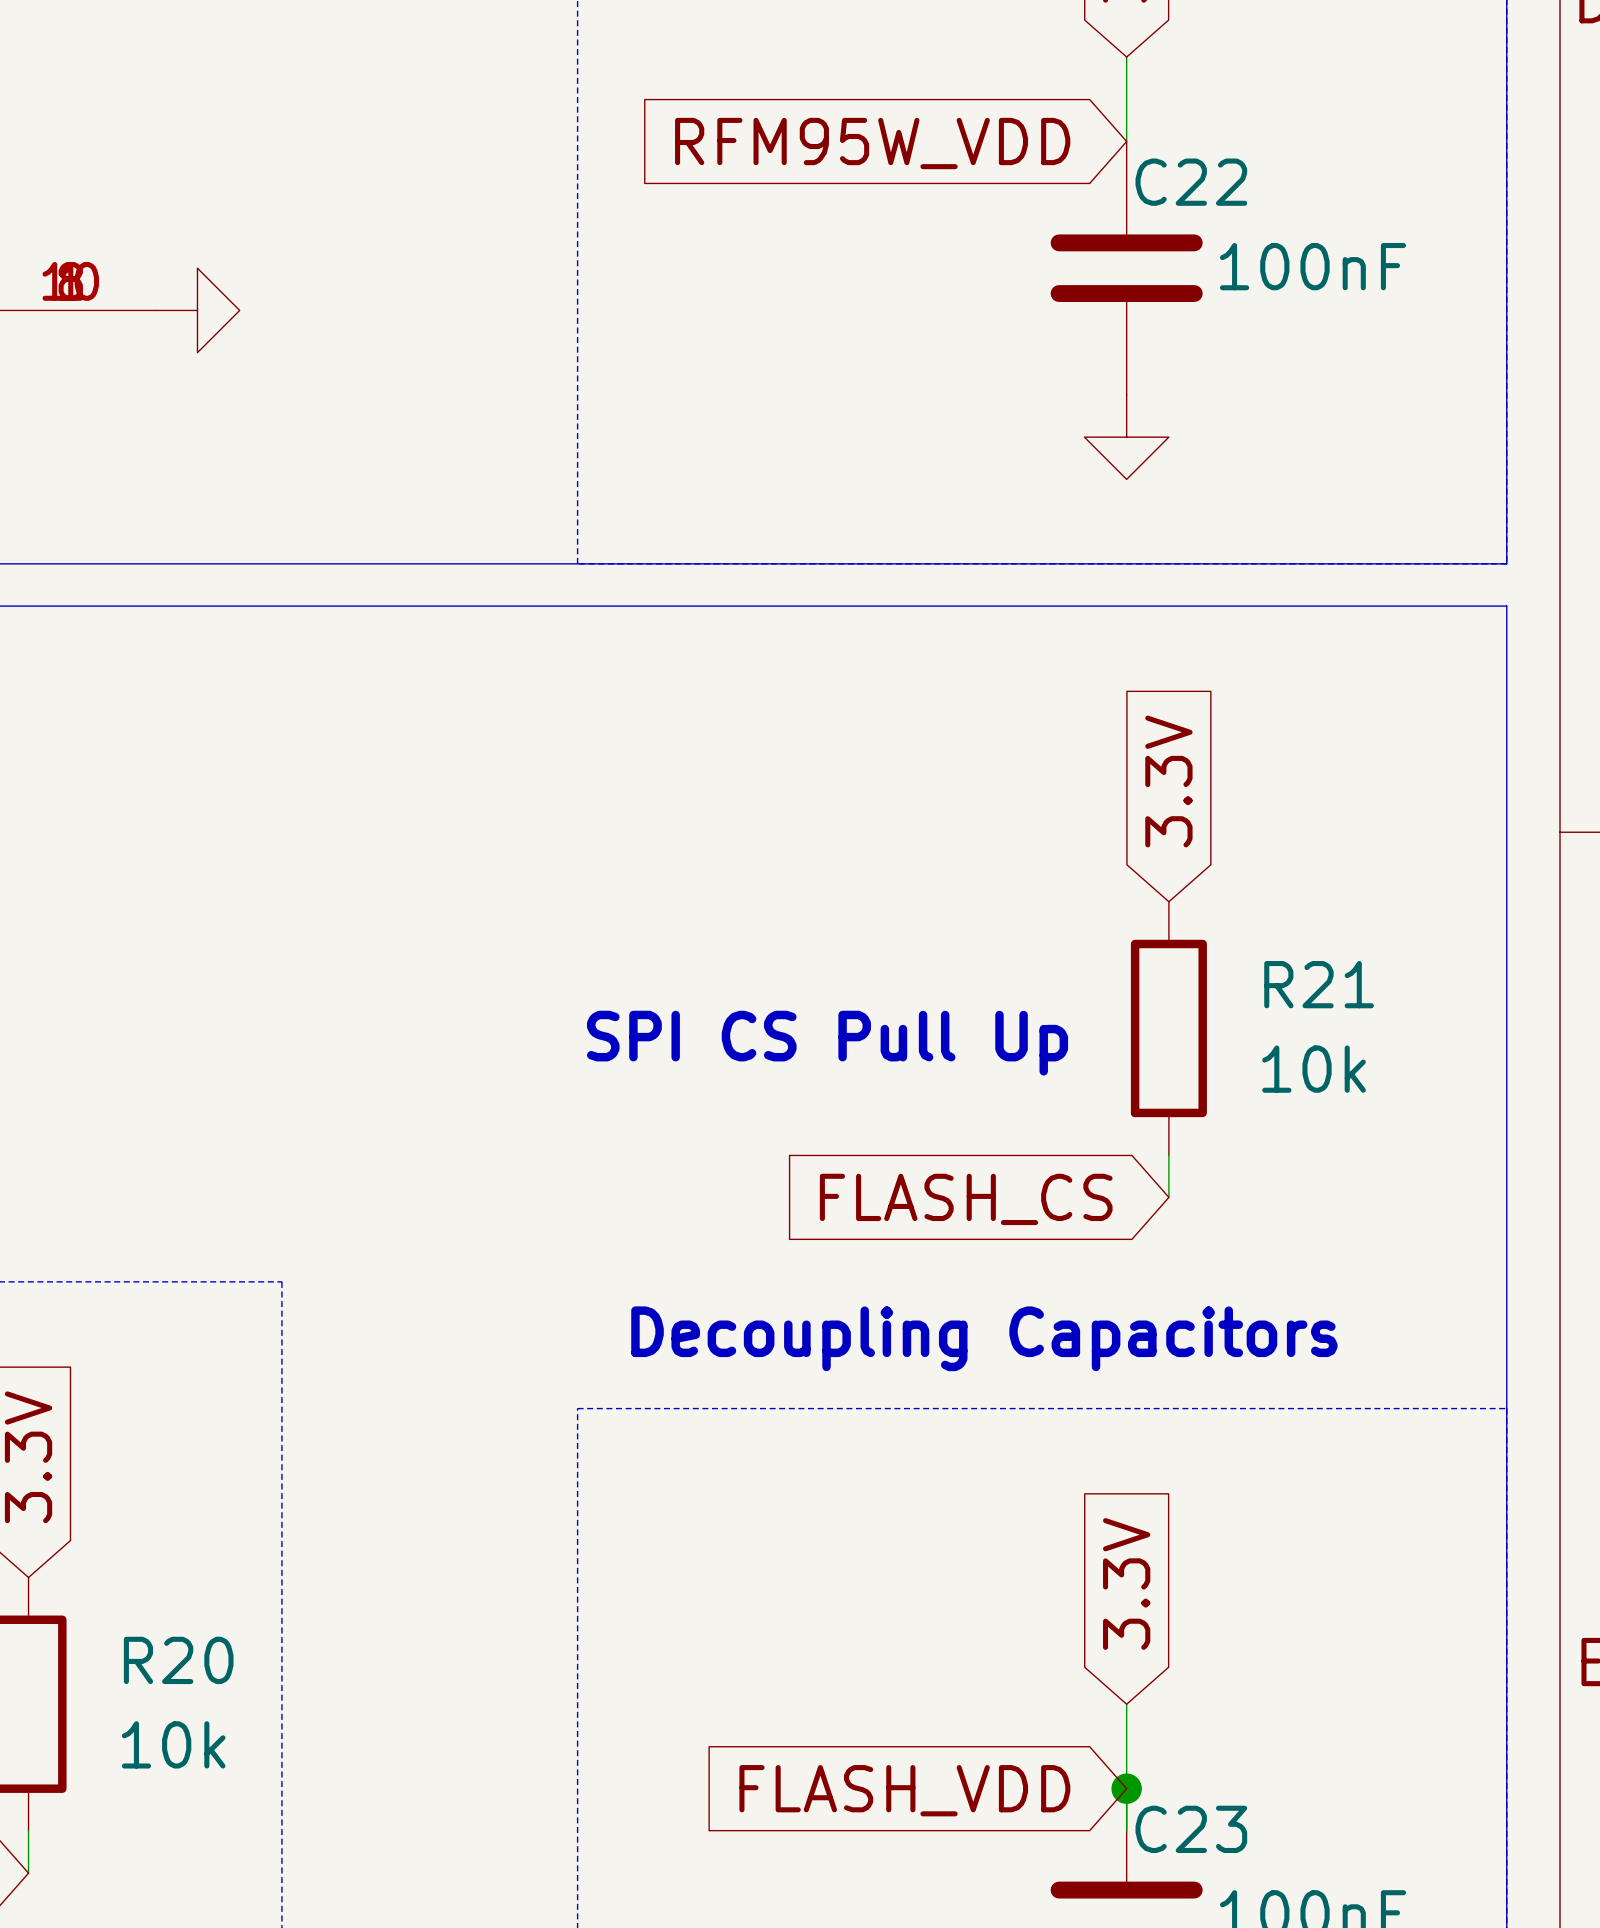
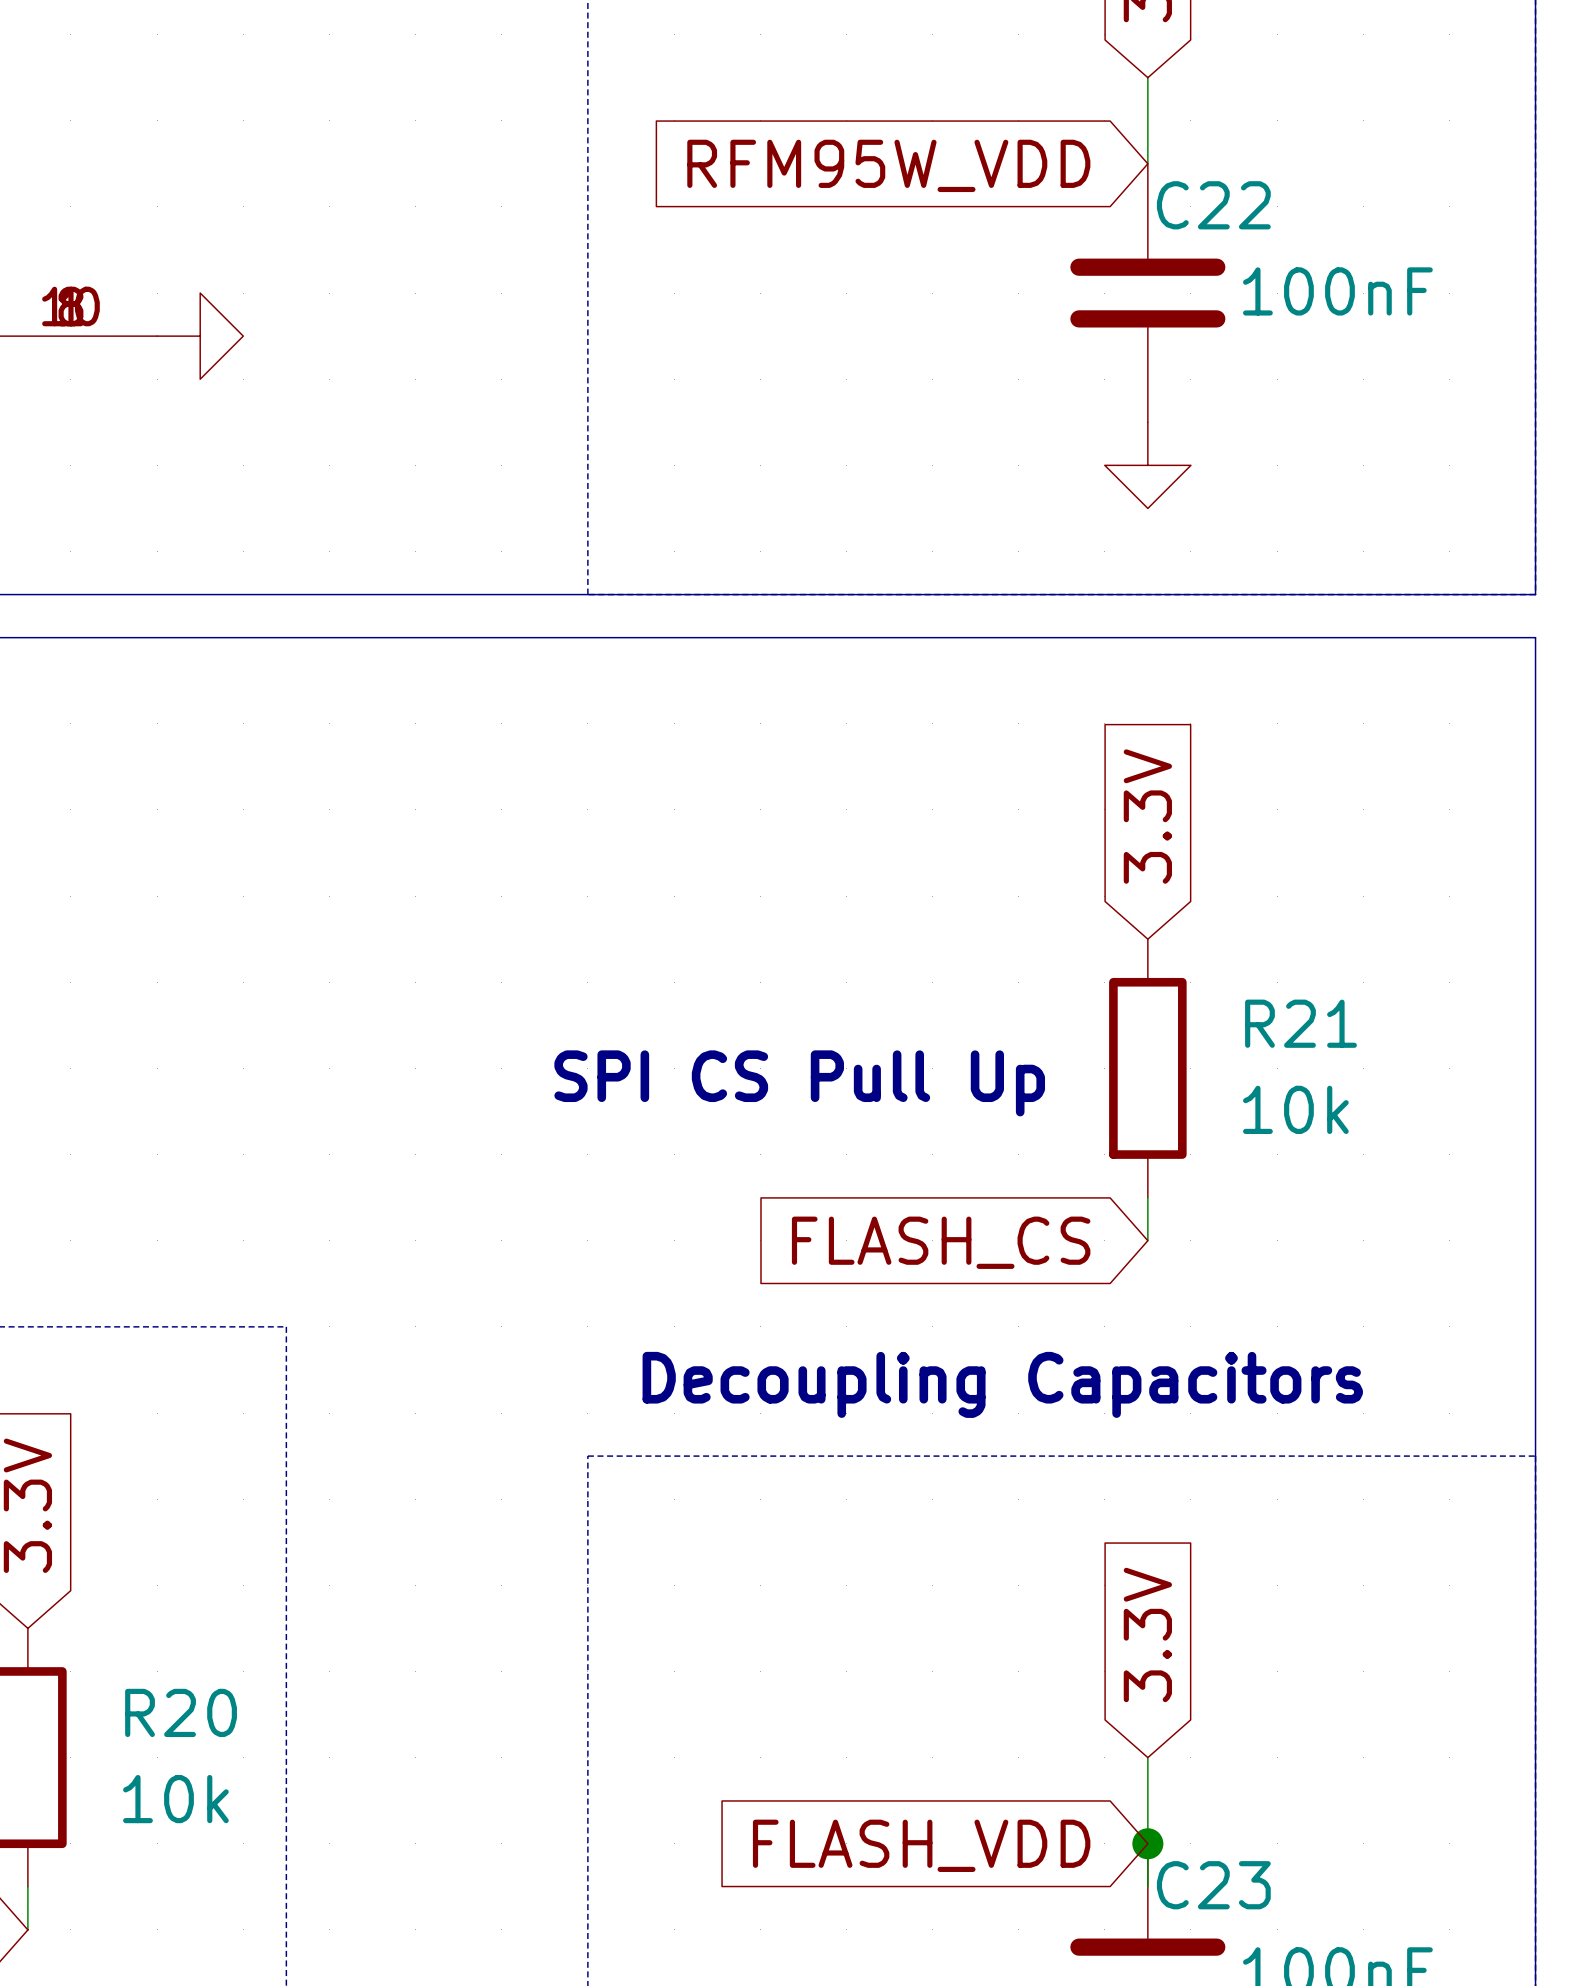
global label position: 3.3V (1168, 781) -> 3.3V (1147, 816)
R21 position: (1168, 1028) -> (1147, 1068)
text position: SPI CS Pull Up (827, 1043) -> SPI CS Pull Up (799, 1083)
wire: (1168, 1155) (1168, 1197) -> (1147, 1197) (1147, 1240)
global label position: FLASH_CS (966, 1199) -> FLASH_CS (941, 1242)

